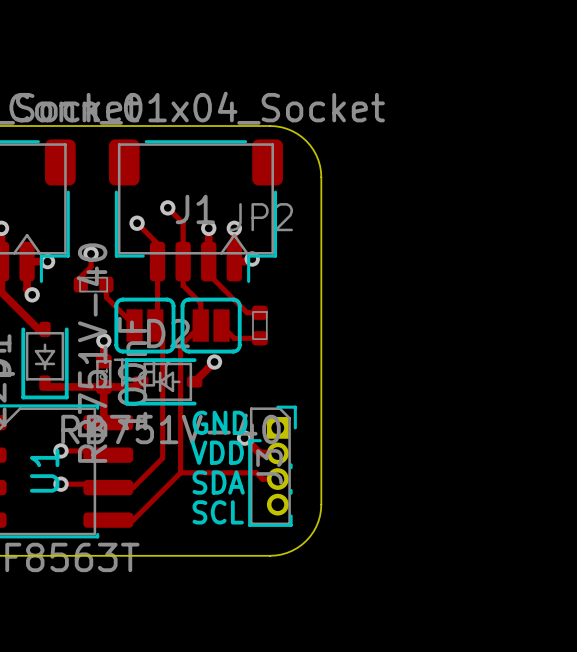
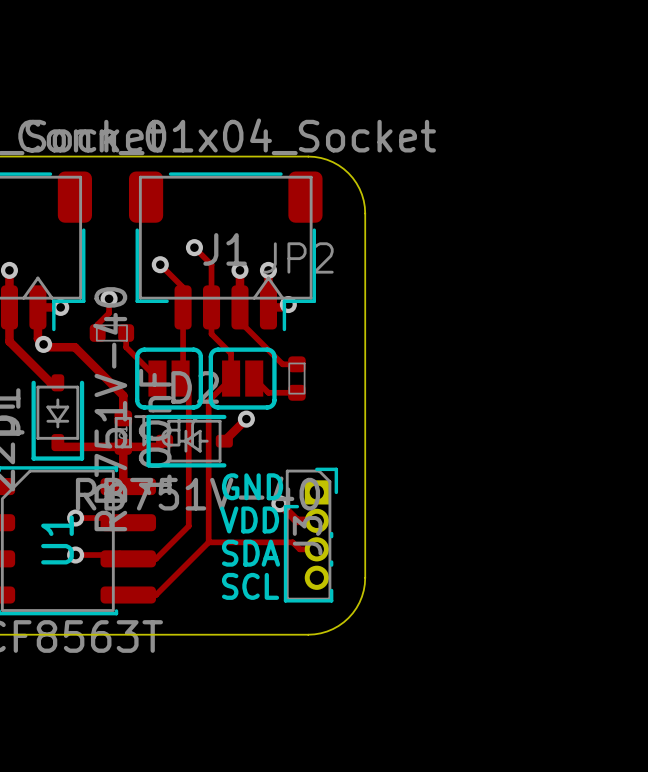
track: none -> (46, 347) (74, 347) (123, 395)
via: (103, 340) -> none

